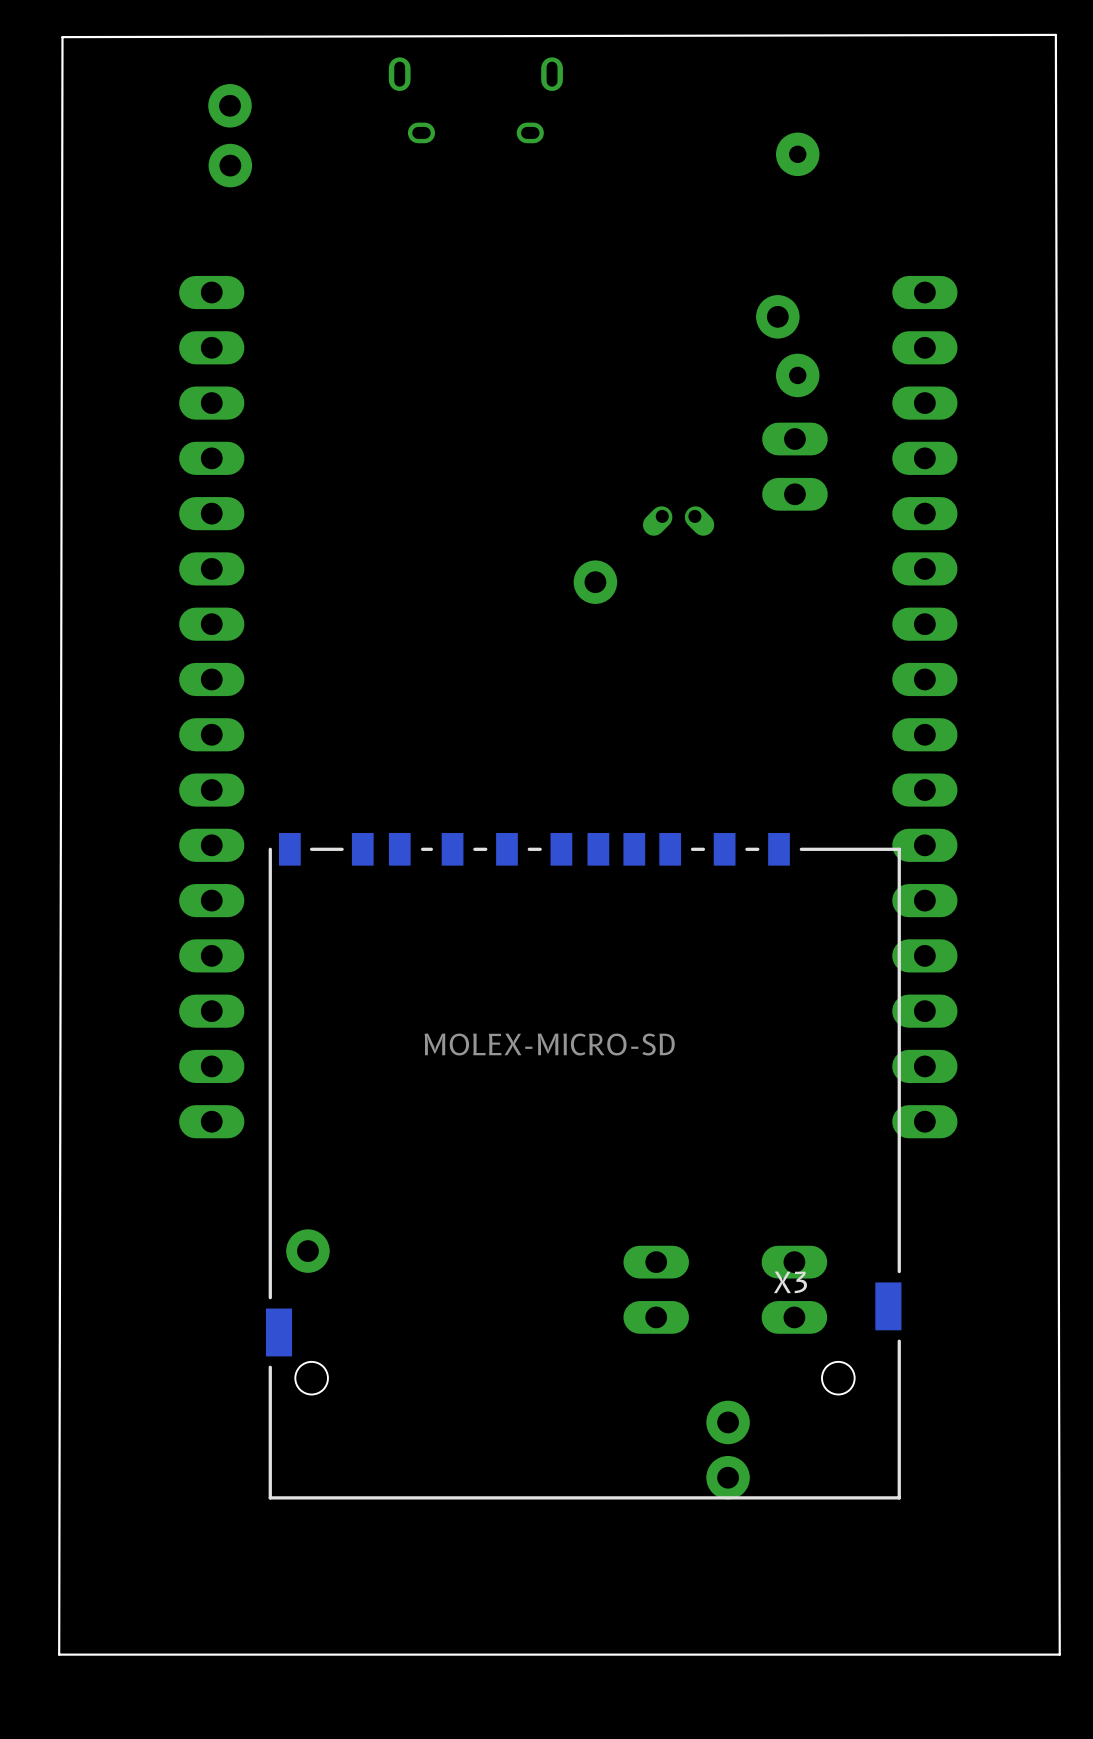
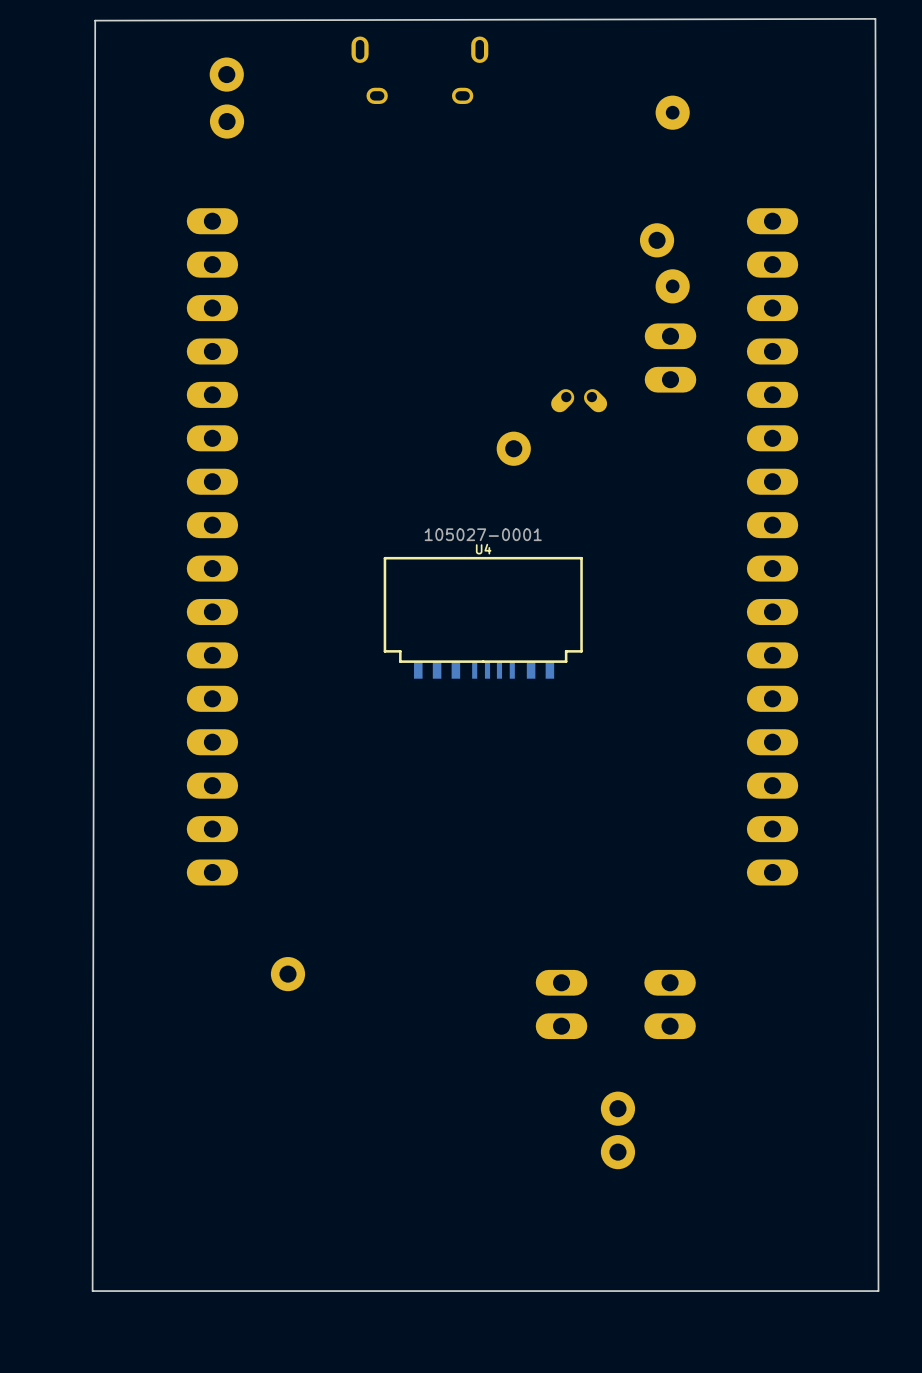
U4: none -> 105027-0001 (483, 617)
X3: MOLEX-MICRO-SD (583, 1166) -> none

